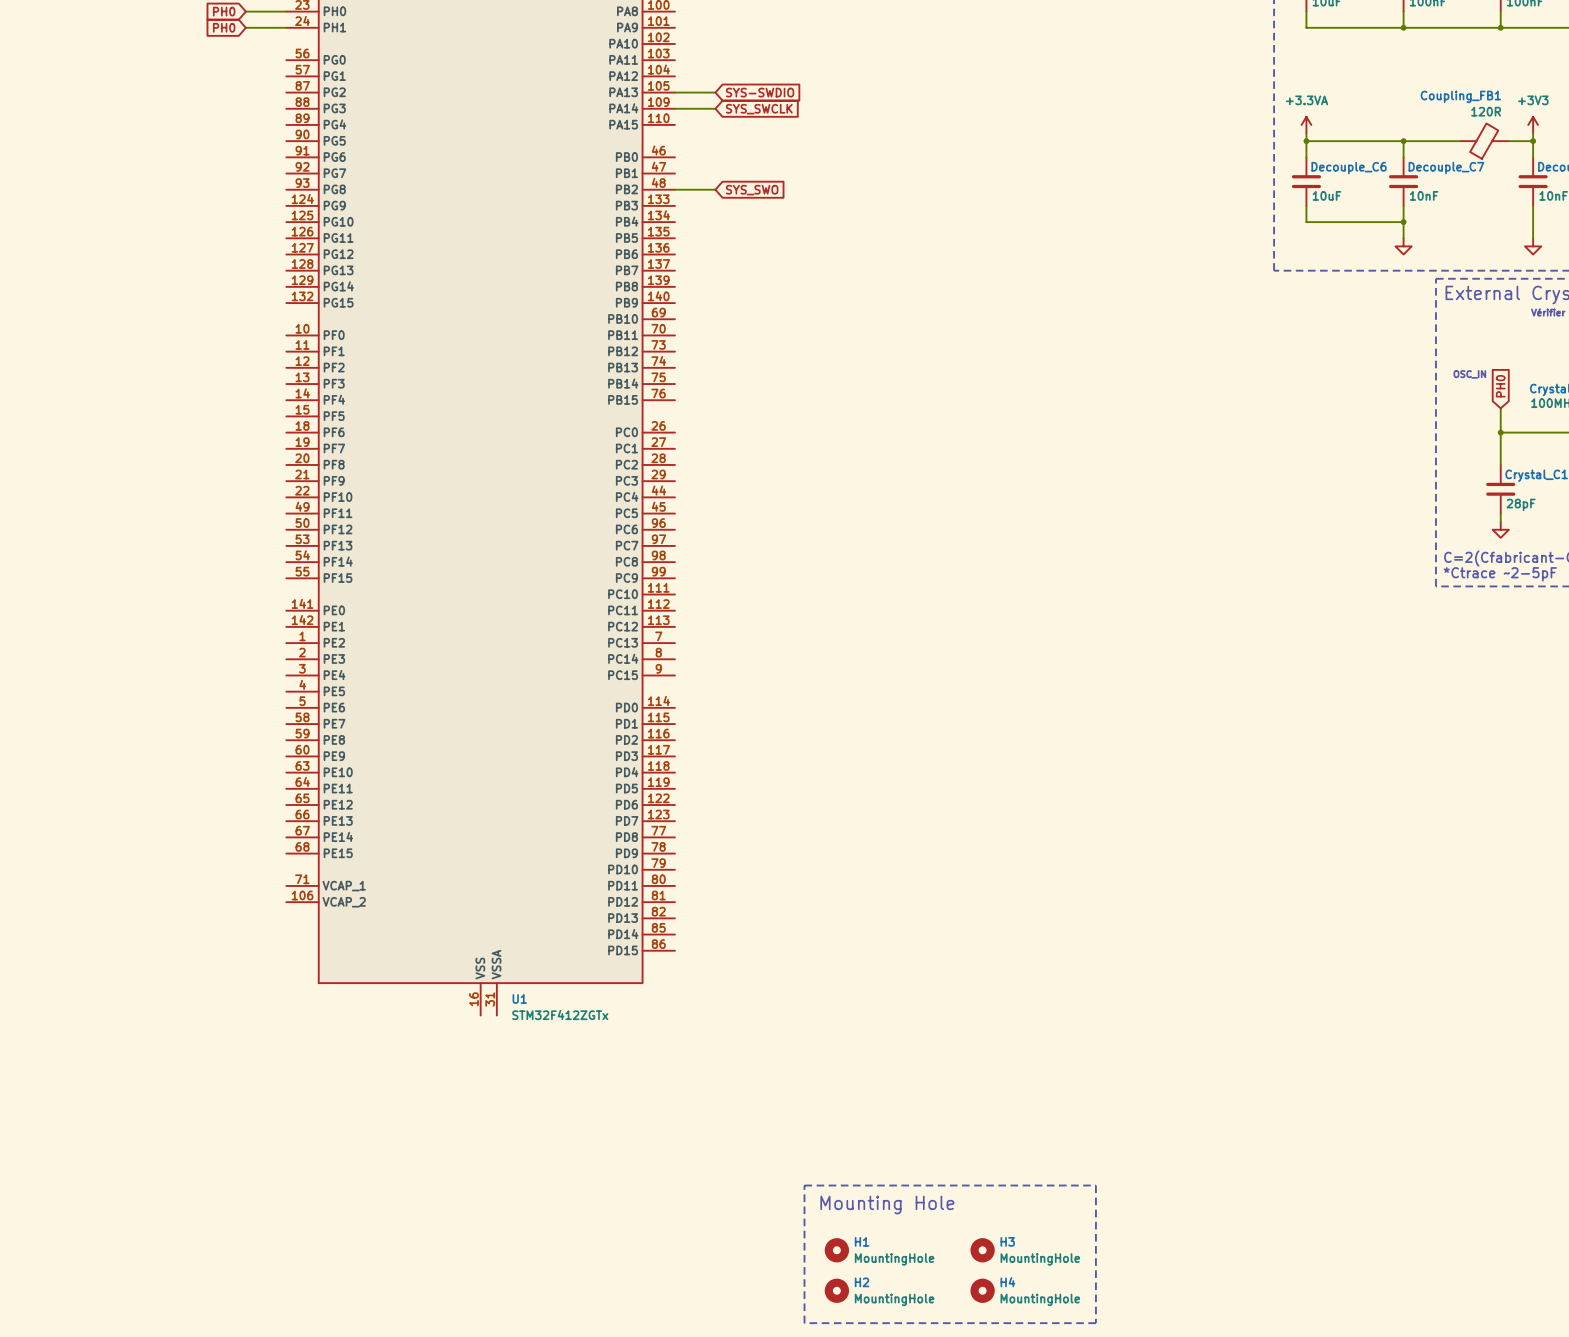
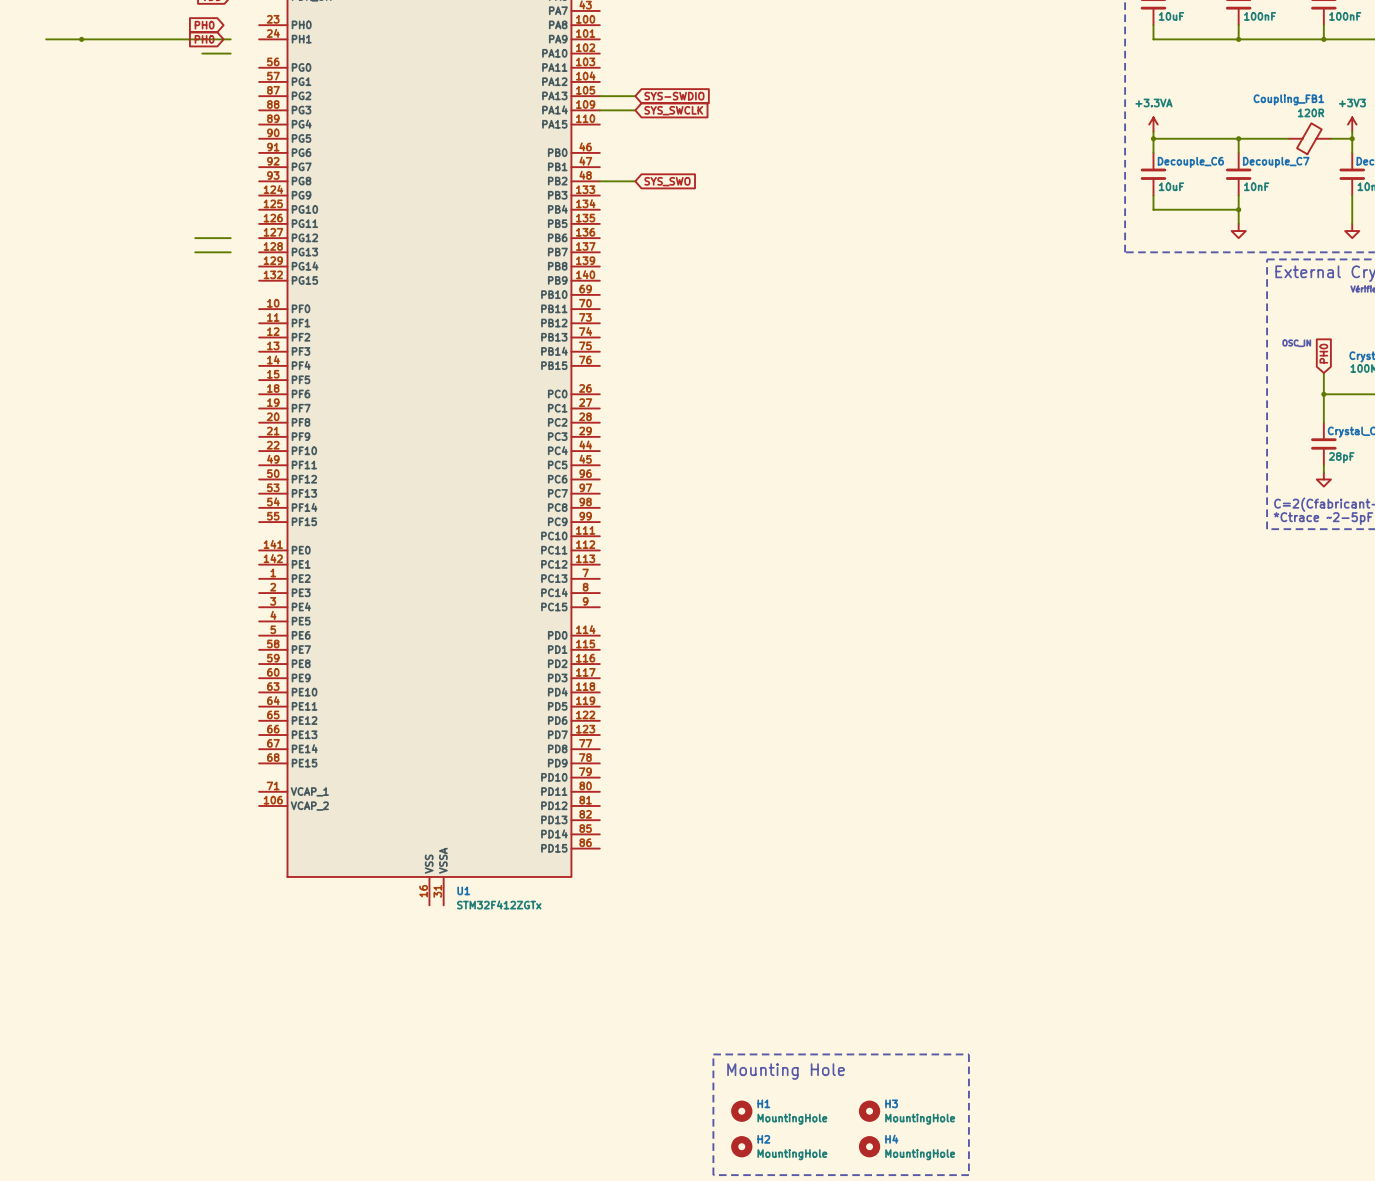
wire: (245, 11) (286, 11) -> none
wire: none -> (46, 39) (223, 39)
junction: none -> (81, 39)
wire: (253, 27) (286, 27) -> (202, 53) (230, 53)
wire: none -> (195, 238) (230, 238)
wire: none -> (195, 252) (230, 252)

